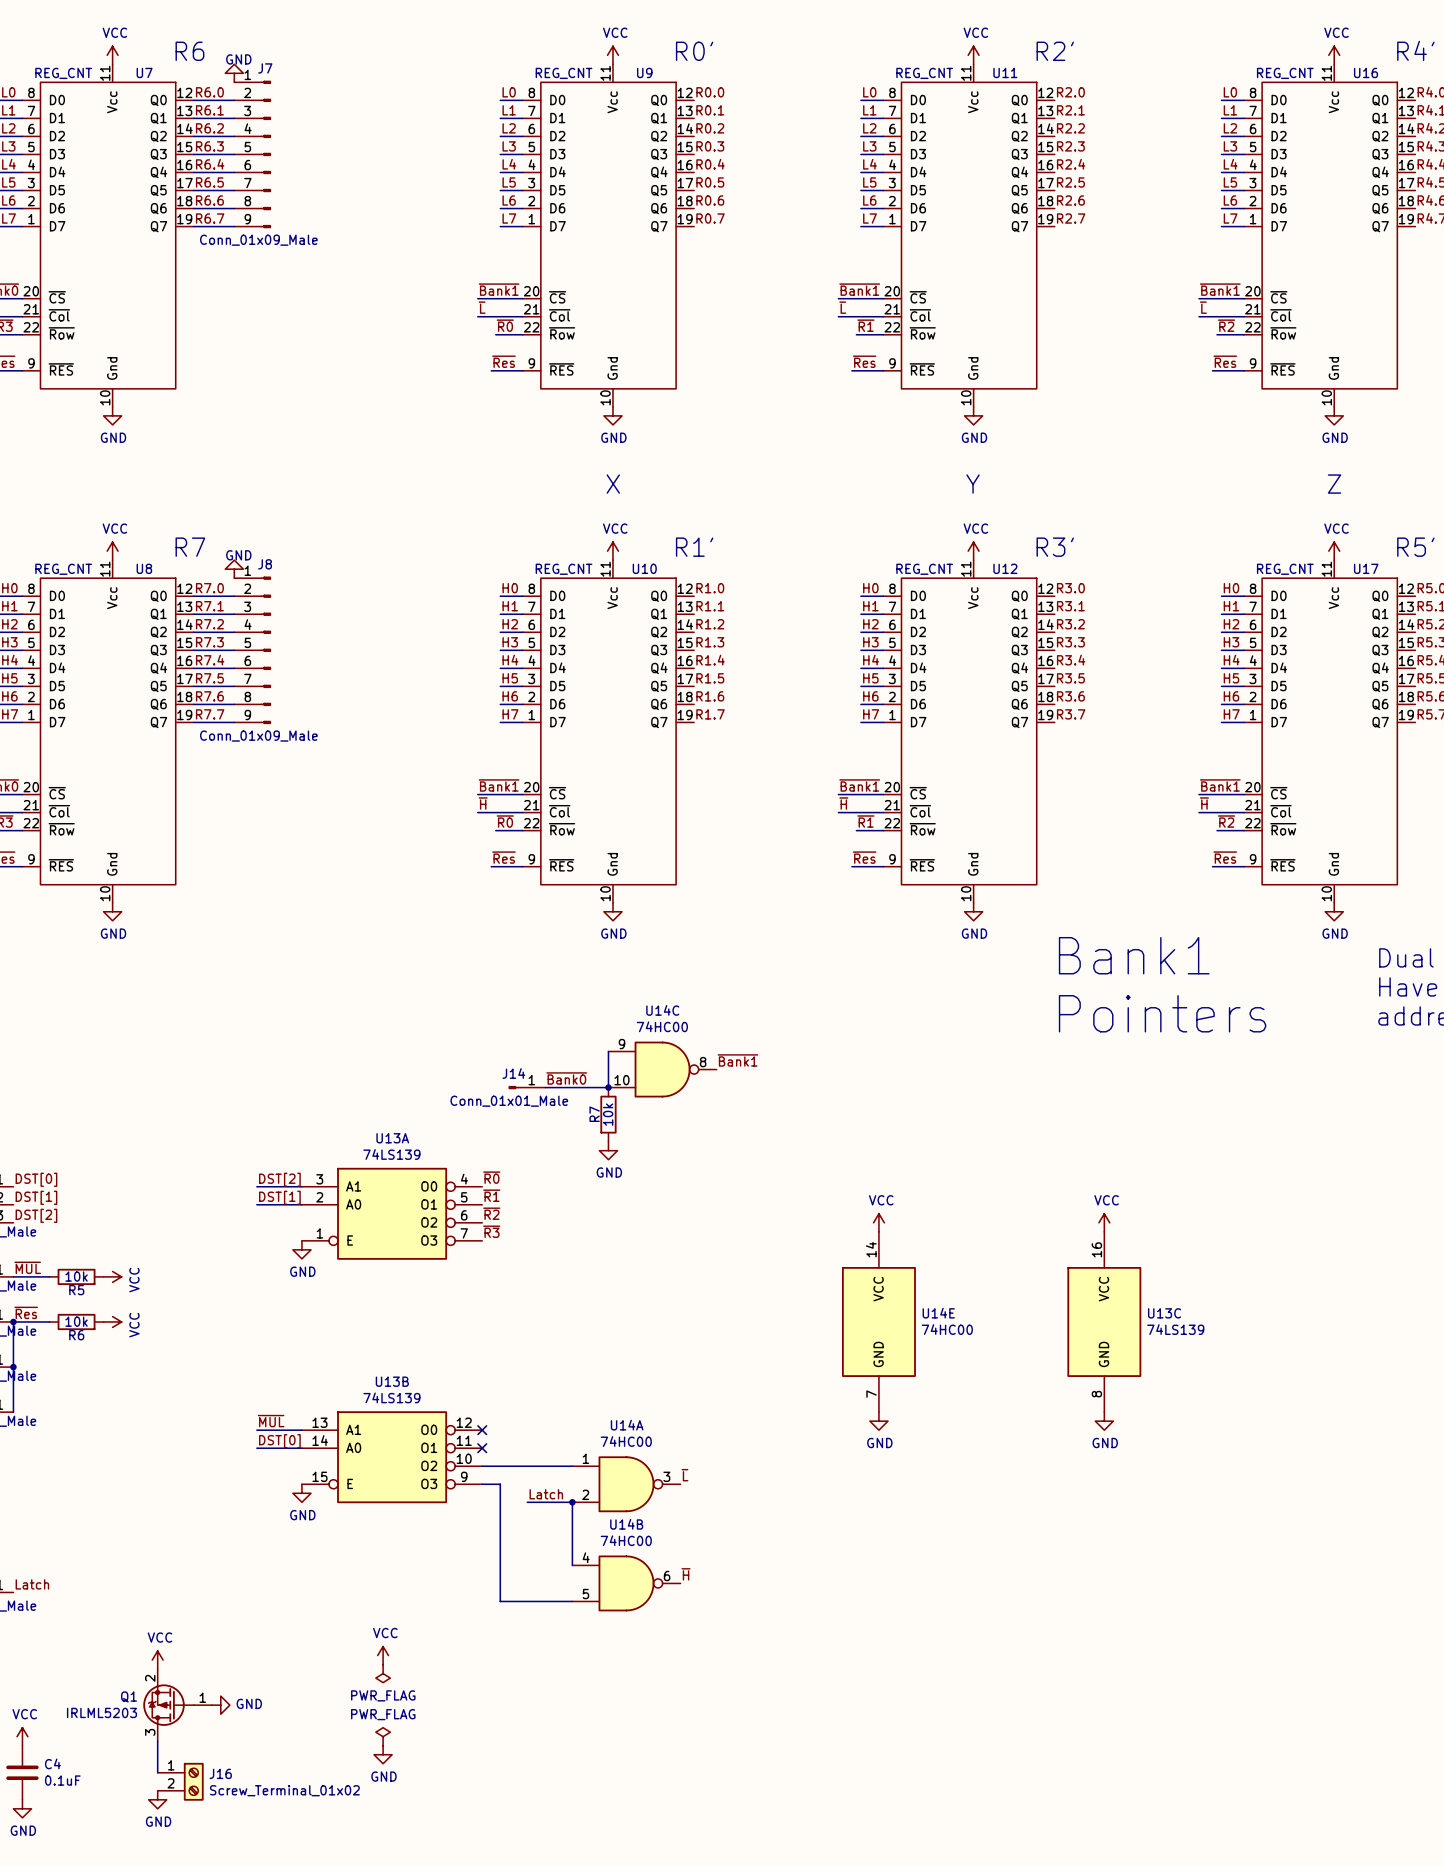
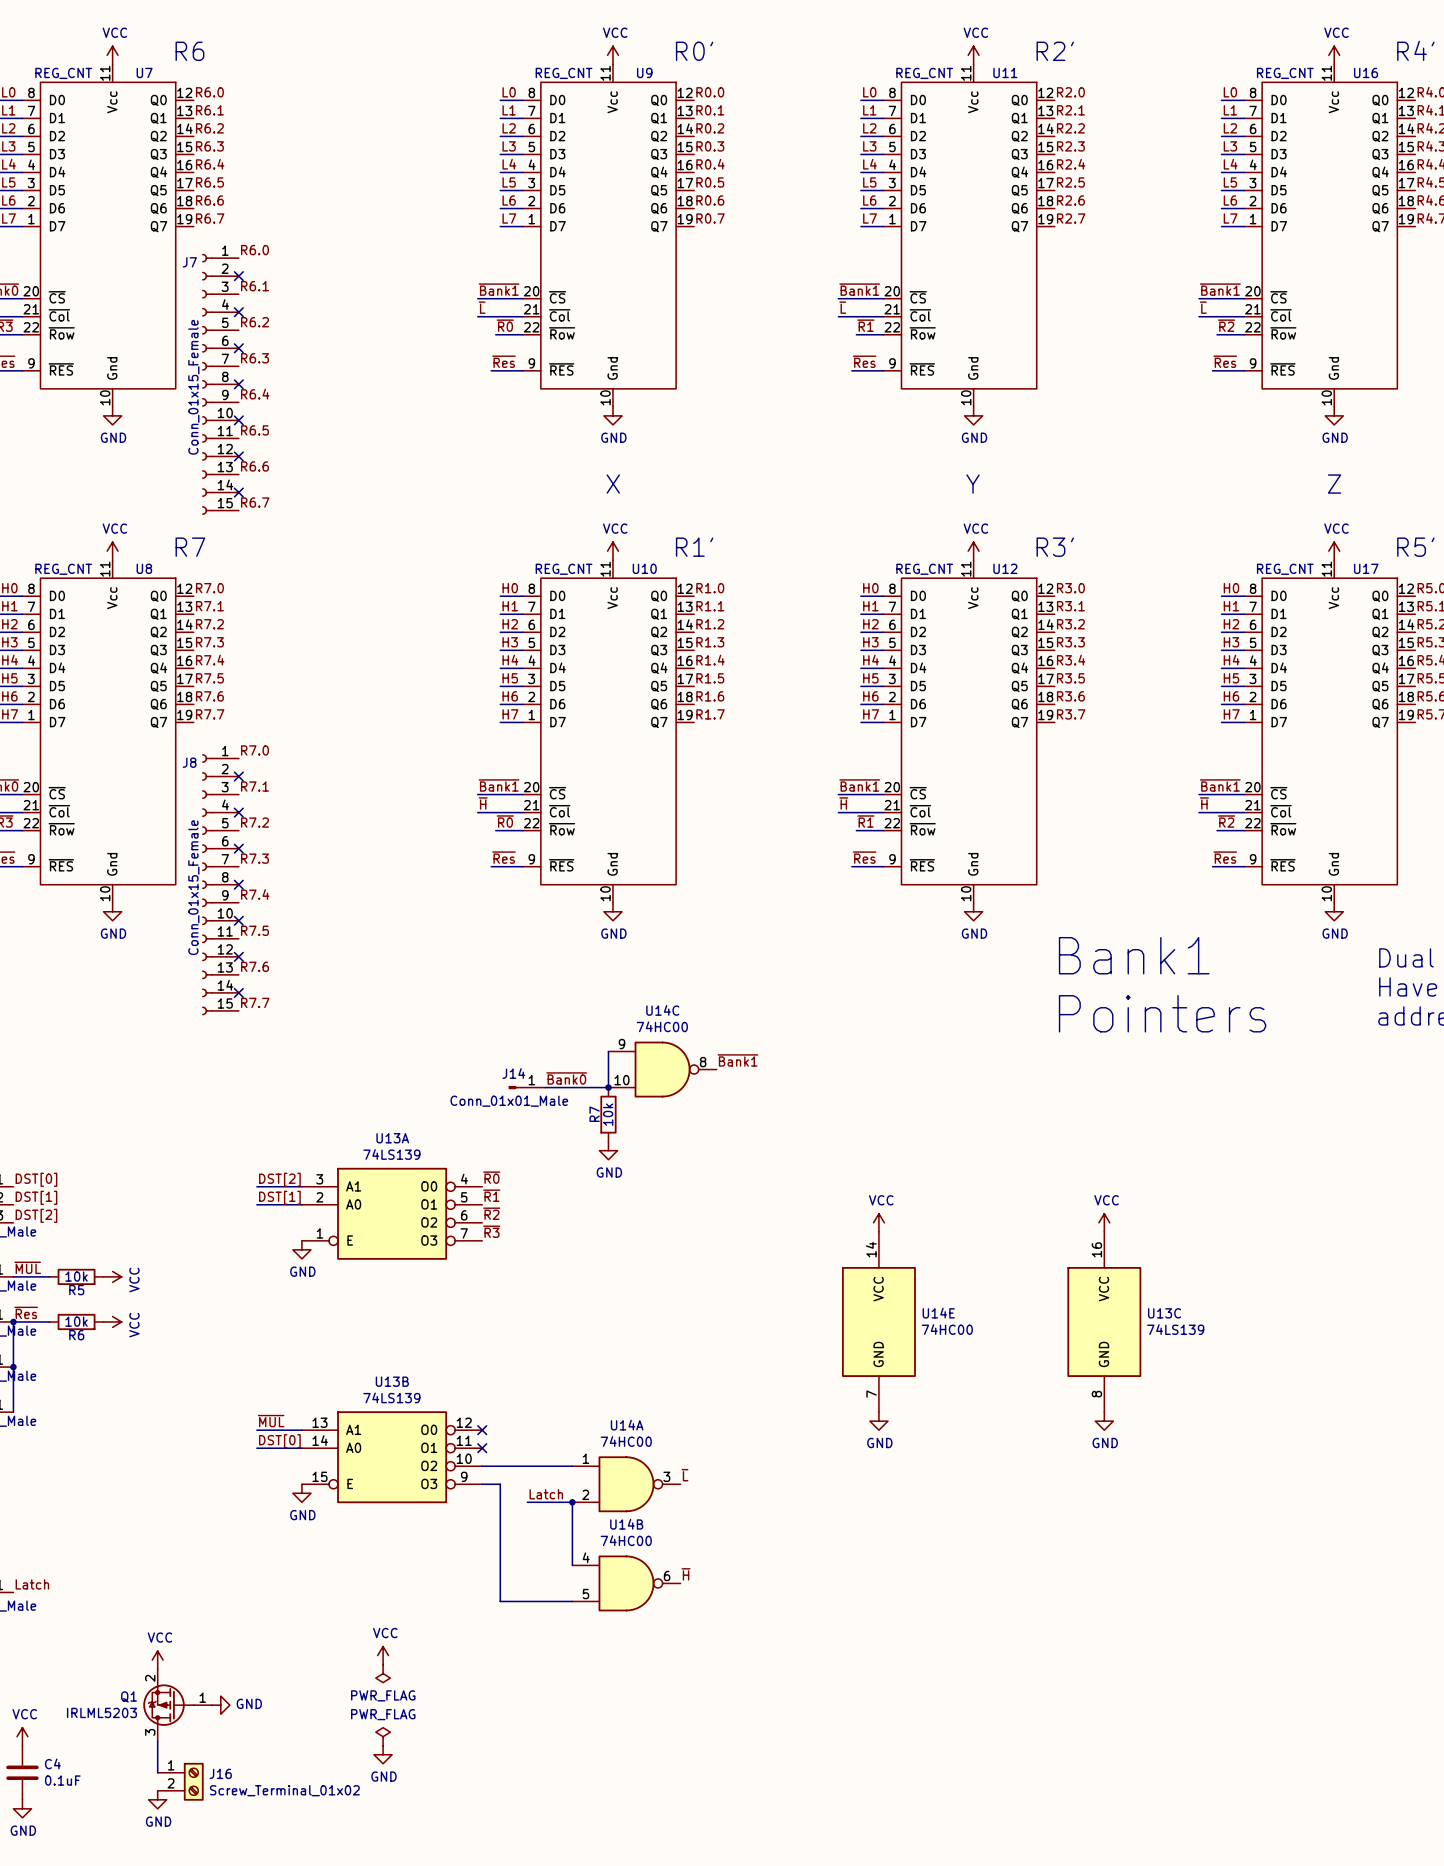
J7 name position: J7 (265, 68) -> J7 (189, 262)
power symbol: GND (234, 73) -> none
J7 symbol: [234, 80, 271, 229] -> [202, 253, 239, 515]
wire: (193, 100) (234, 100) -> none
wire: (193, 118) (234, 118) -> none
wire: (193, 136) (234, 136) -> none
wire: (193, 154) (234, 154) -> none
wire: (193, 172) (234, 172) -> none
wire: (193, 190) (234, 190) -> none
wire: (193, 208) (234, 208) -> none
wire: (193, 226) (234, 226) -> none
J7 value: Conn_01x09_Male (258, 240) -> Conn_01x15_Female (193, 387)
label: none -> R6.0 (254, 250)
no-connect mark: none -> (238, 276)
label: none -> R6.1 (254, 286)
no-connect mark: none -> (238, 312)
label: none -> R6.2 (254, 322)
no-connect mark: none -> (238, 348)
label: none -> R6.3 (254, 358)
no-connect mark: none -> (238, 384)
label: none -> R6.4 (255, 394)
no-connect mark: none -> (238, 420)
label: none -> R6.5 (254, 430)
no-connect mark: none -> (238, 456)
label: none -> R6.6 (254, 466)
no-connect mark: none -> (238, 492)
label: none -> R6.7 (255, 502)
J8 name position: J8 (265, 564) -> J8 (189, 762)
power symbol: GND (234, 569) -> none
J8 symbol: [234, 576, 271, 724] -> [202, 754, 239, 1016]
wire: (193, 596) (234, 596) -> none
wire: (193, 614) (234, 614) -> none
wire: (193, 632) (234, 632) -> none
wire: (193, 650) (234, 650) -> none
wire: (193, 668) (234, 668) -> none
wire: (193, 686) (234, 686) -> none
wire: (193, 704) (234, 704) -> none
wire: (193, 722) (234, 722) -> none
J8 value: Conn_01x09_Male (258, 736) -> Conn_01x15_Female (193, 887)
label: none -> R7.0 (254, 750)
no-connect mark: none -> (238, 776)
label: none -> R7.1 (254, 786)
no-connect mark: none -> (238, 812)
label: none -> R7.2 (254, 822)
no-connect mark: none -> (238, 848)
label: none -> R7.3 (254, 858)
no-connect mark: none -> (238, 884)
label: none -> R7.4 (255, 894)
no-connect mark: none -> (238, 920)
label: none -> R7.5 (254, 930)
no-connect mark: none -> (238, 956)
label: none -> R7.6 (254, 966)
no-connect mark: none -> (238, 992)
label: none -> R7.7 (255, 1002)

